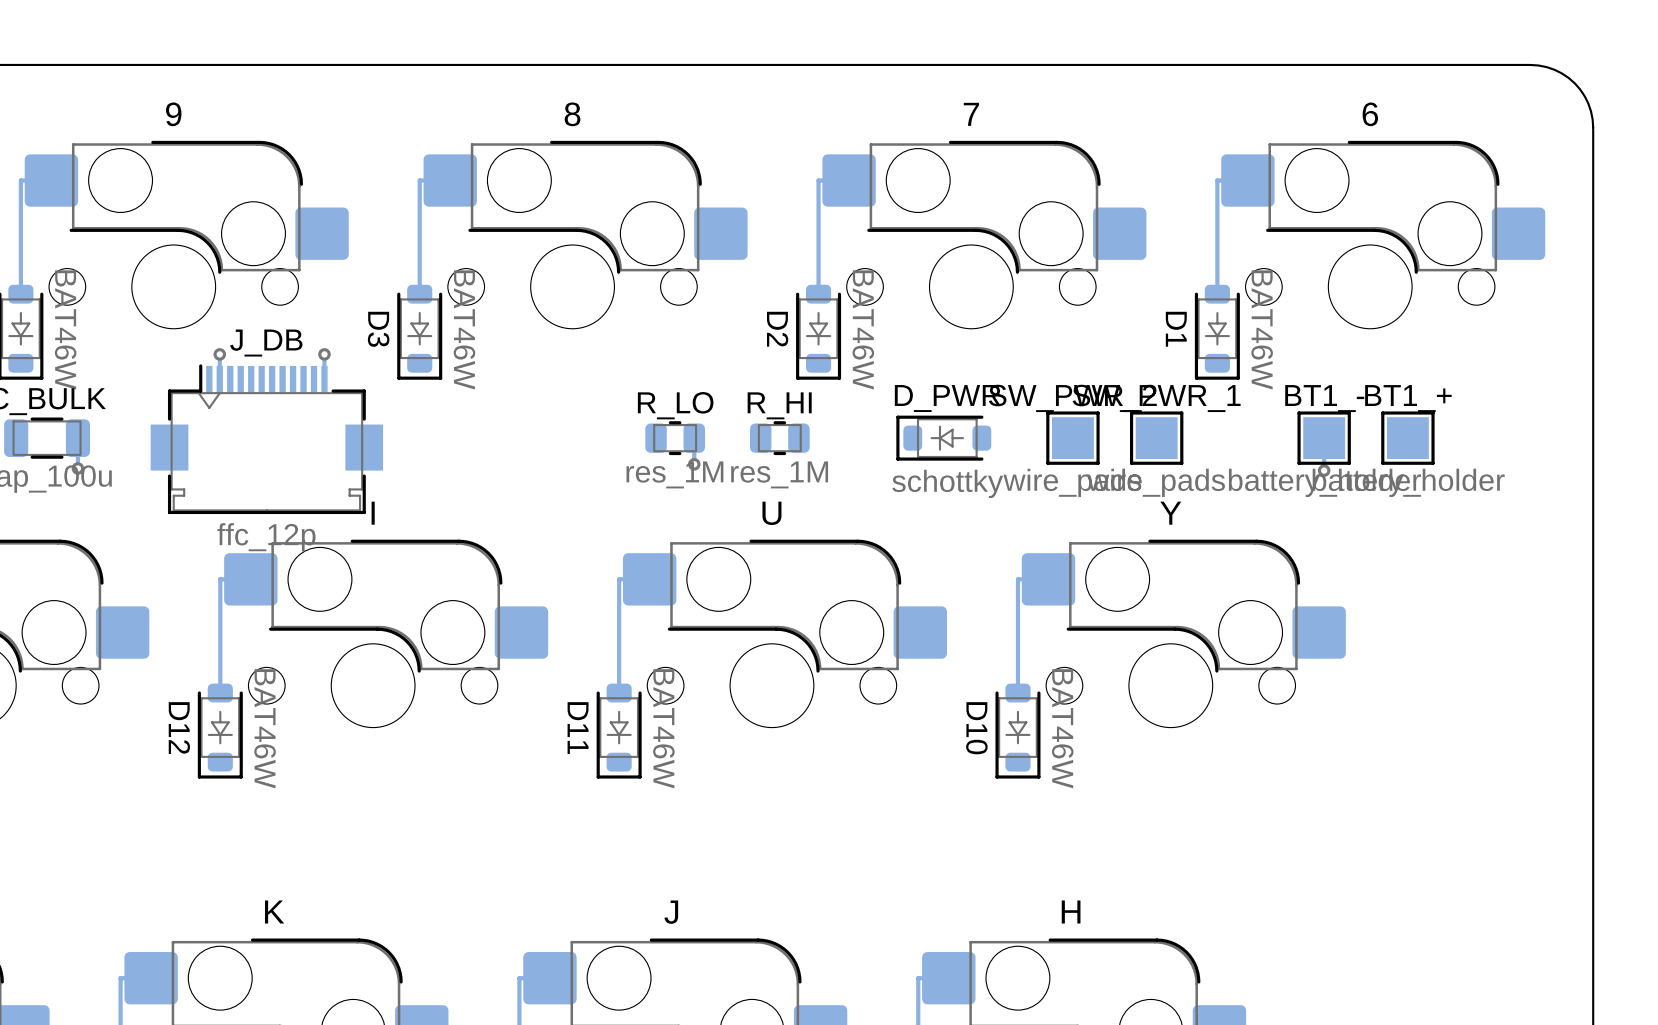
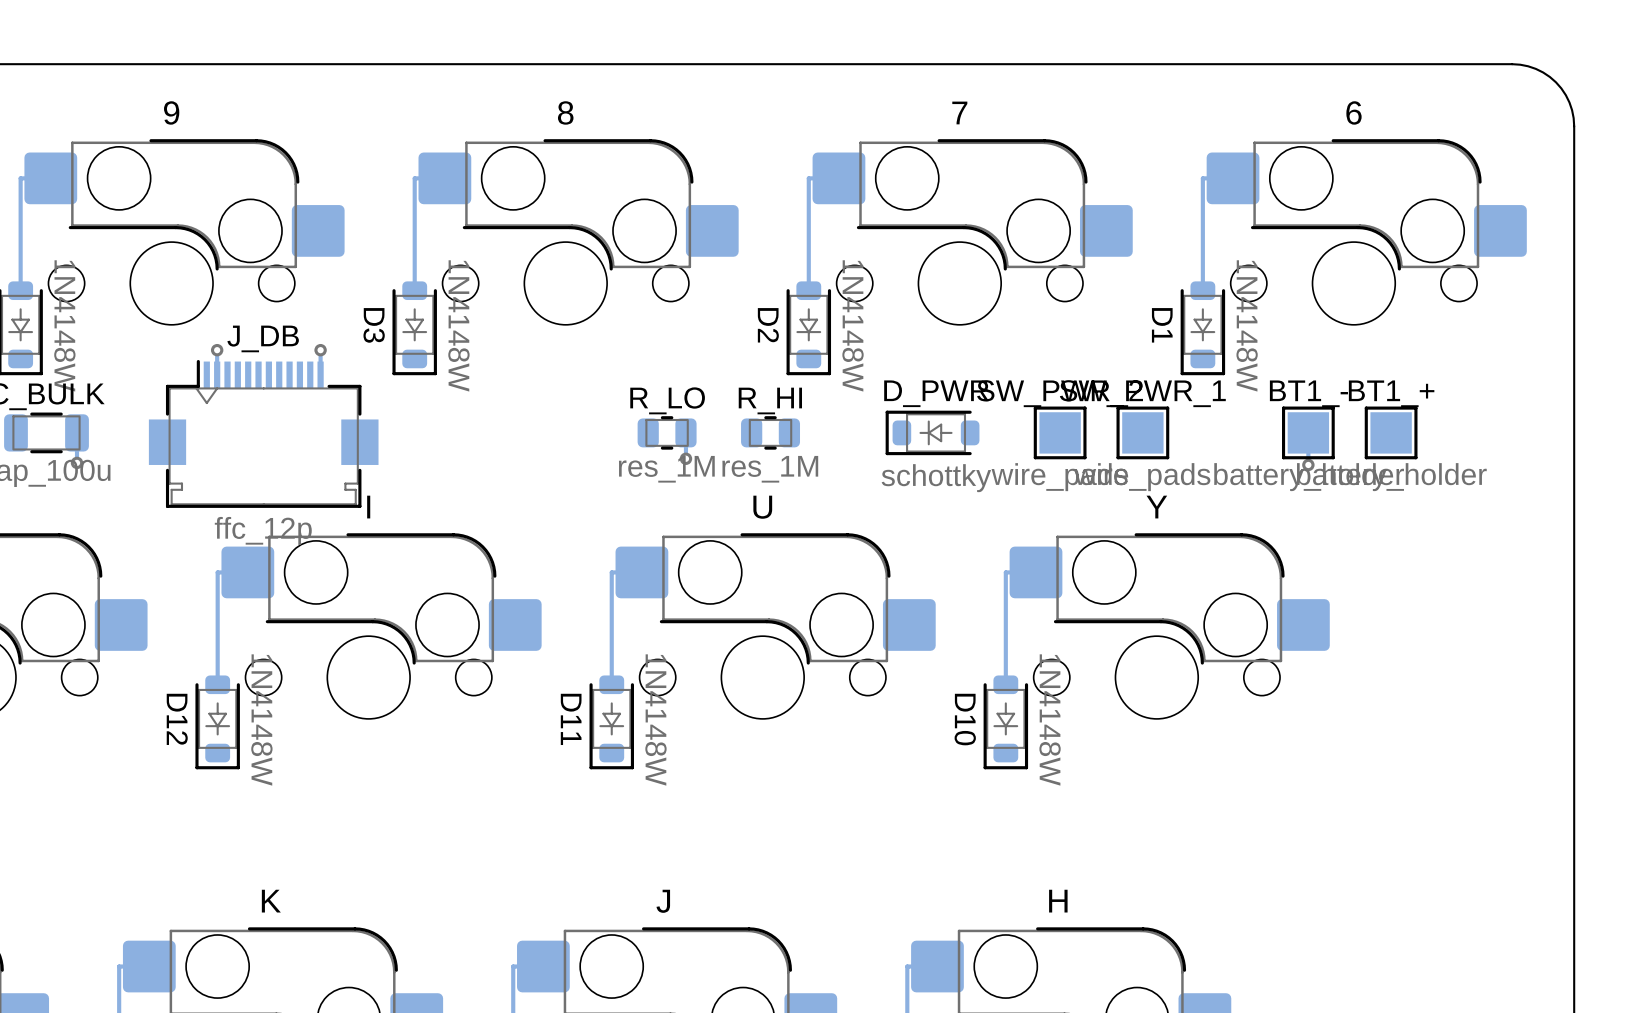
part value: BAT46W (65, 329) -> 1N4148W (64, 325)
D3 value: BAT46W (464, 329) -> 1N4148W (458, 325)
D2 value: BAT46W (863, 329) -> 1N4148W (853, 325)
D1 value: BAT46W (1262, 329) -> 1N4148W (1247, 325)
D12 value: BAT46W (265, 728) -> 1N4148W (261, 720)
D11 value: BAT46W (663, 728) -> 1N4148W (655, 720)
D10 value: BAT46W (1062, 728) -> 1N4148W (1050, 720)

